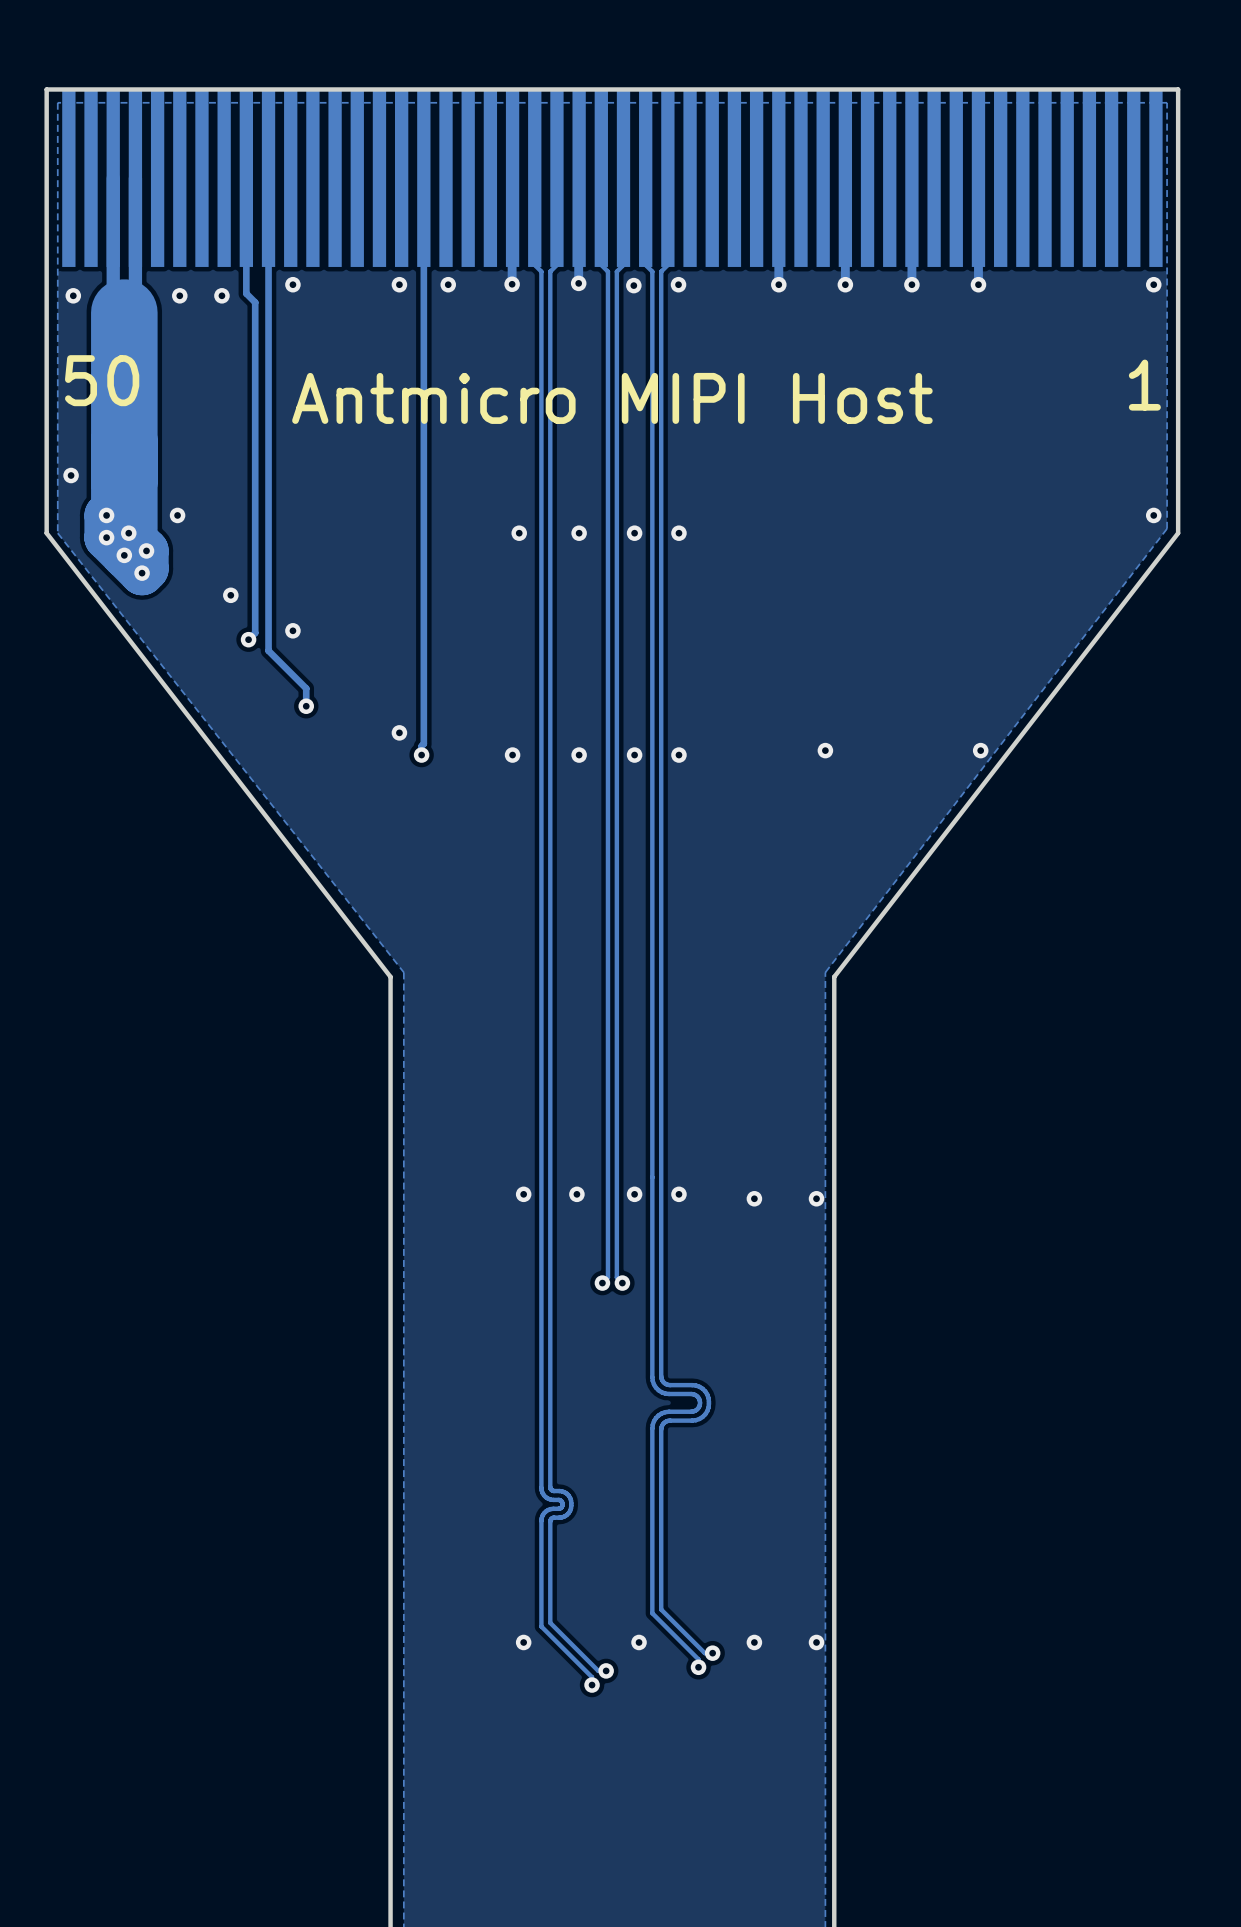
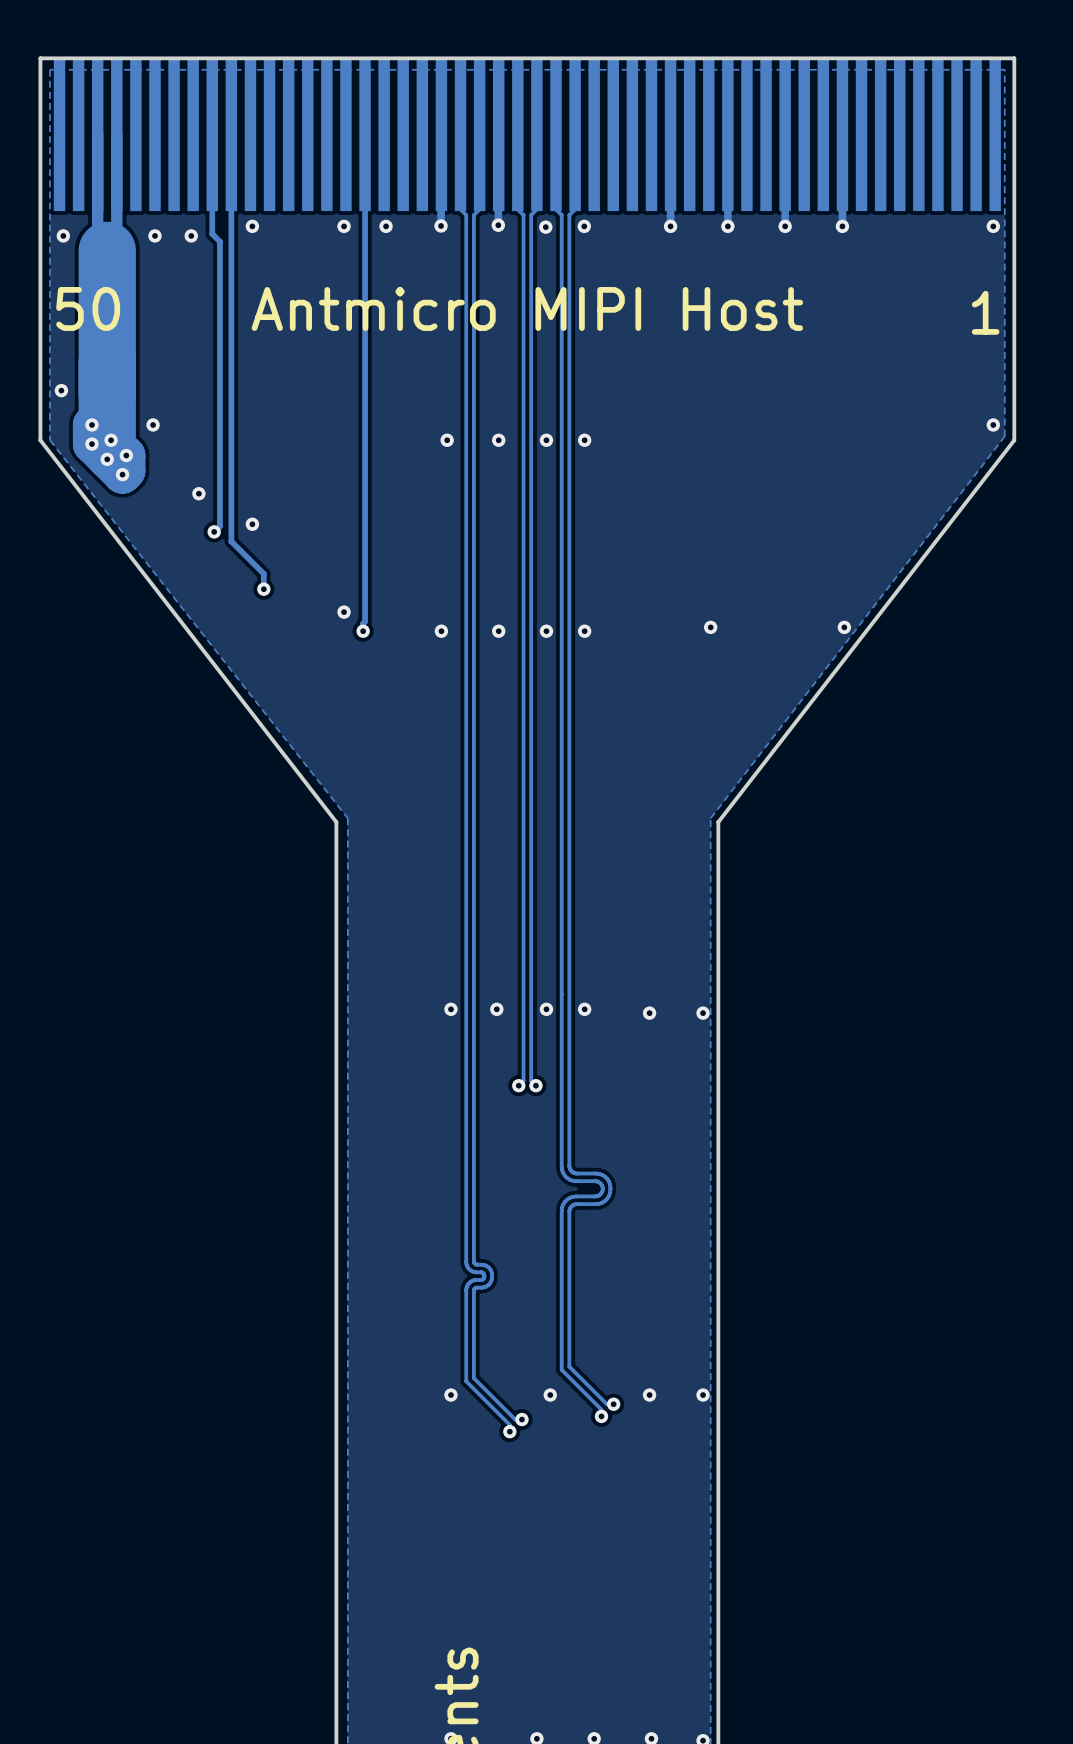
text position: Antmicro MIPI Host (612, 398) -> Antmicro MIPI Host (527, 308)

